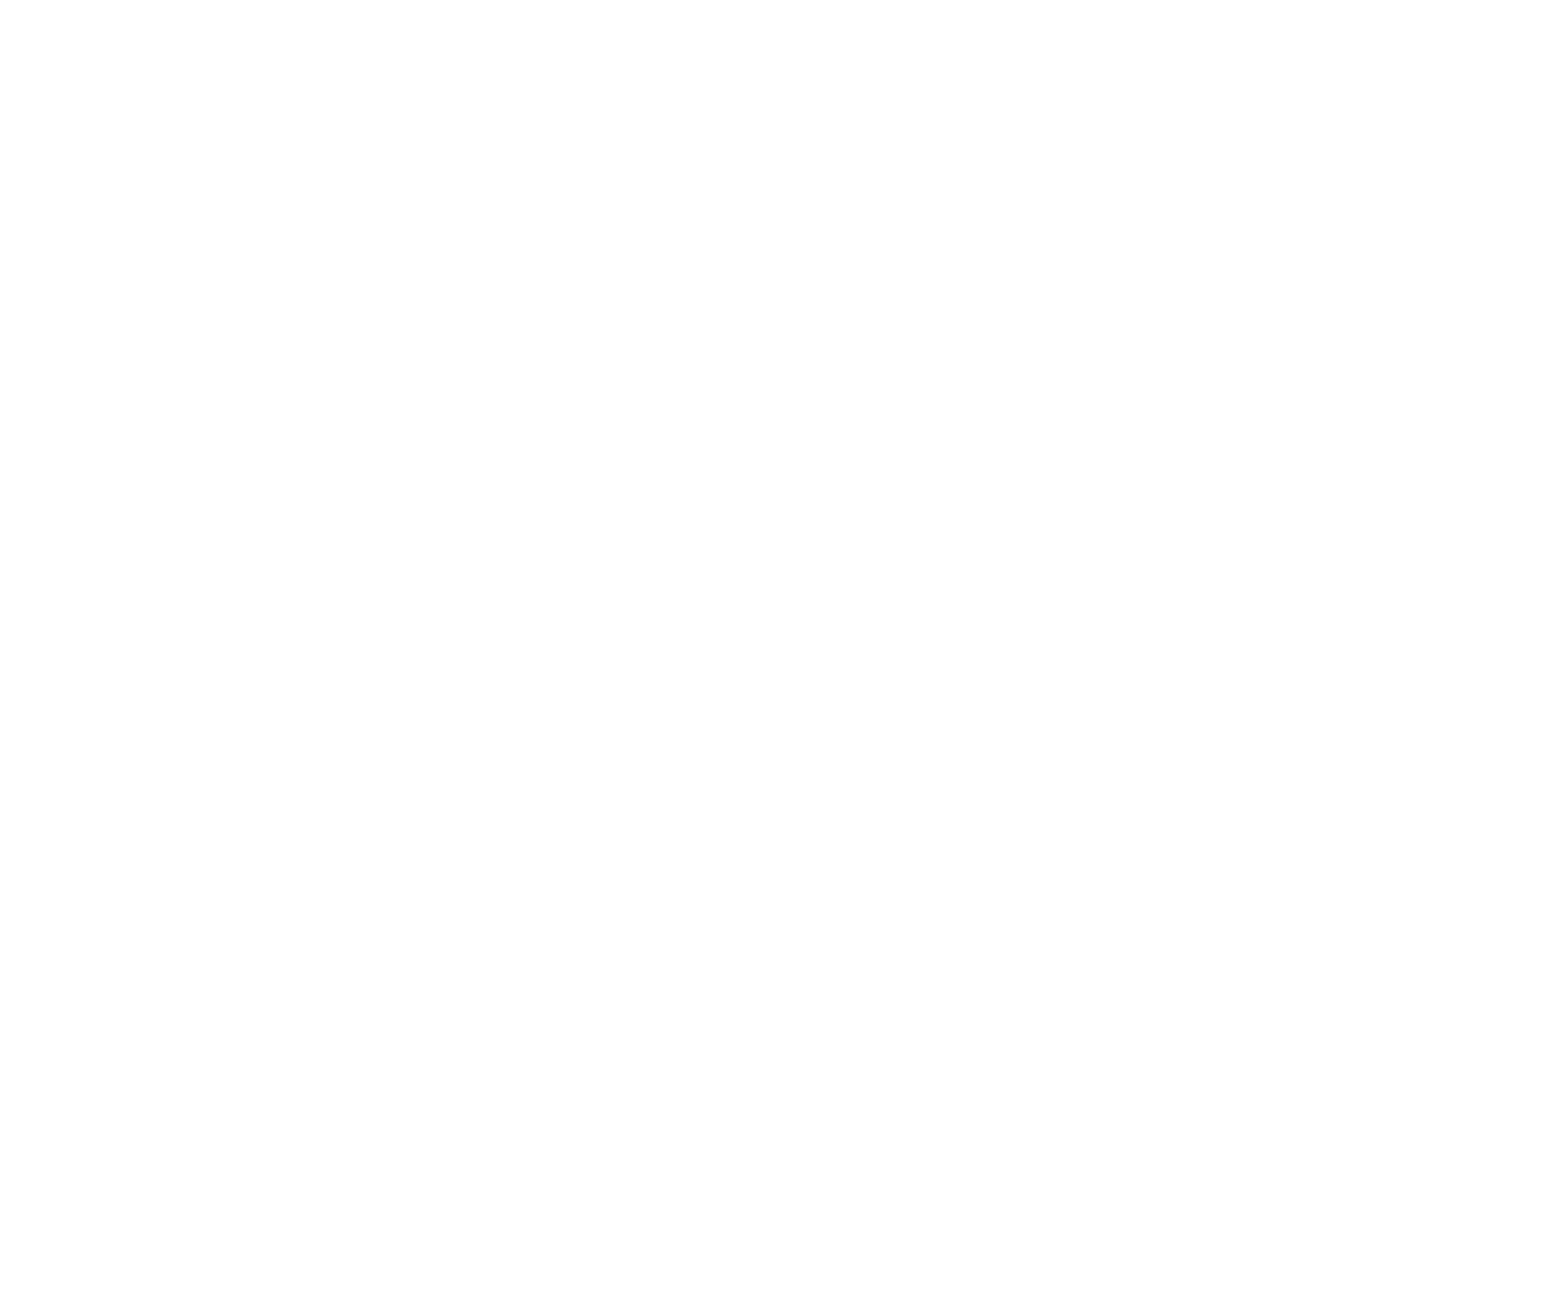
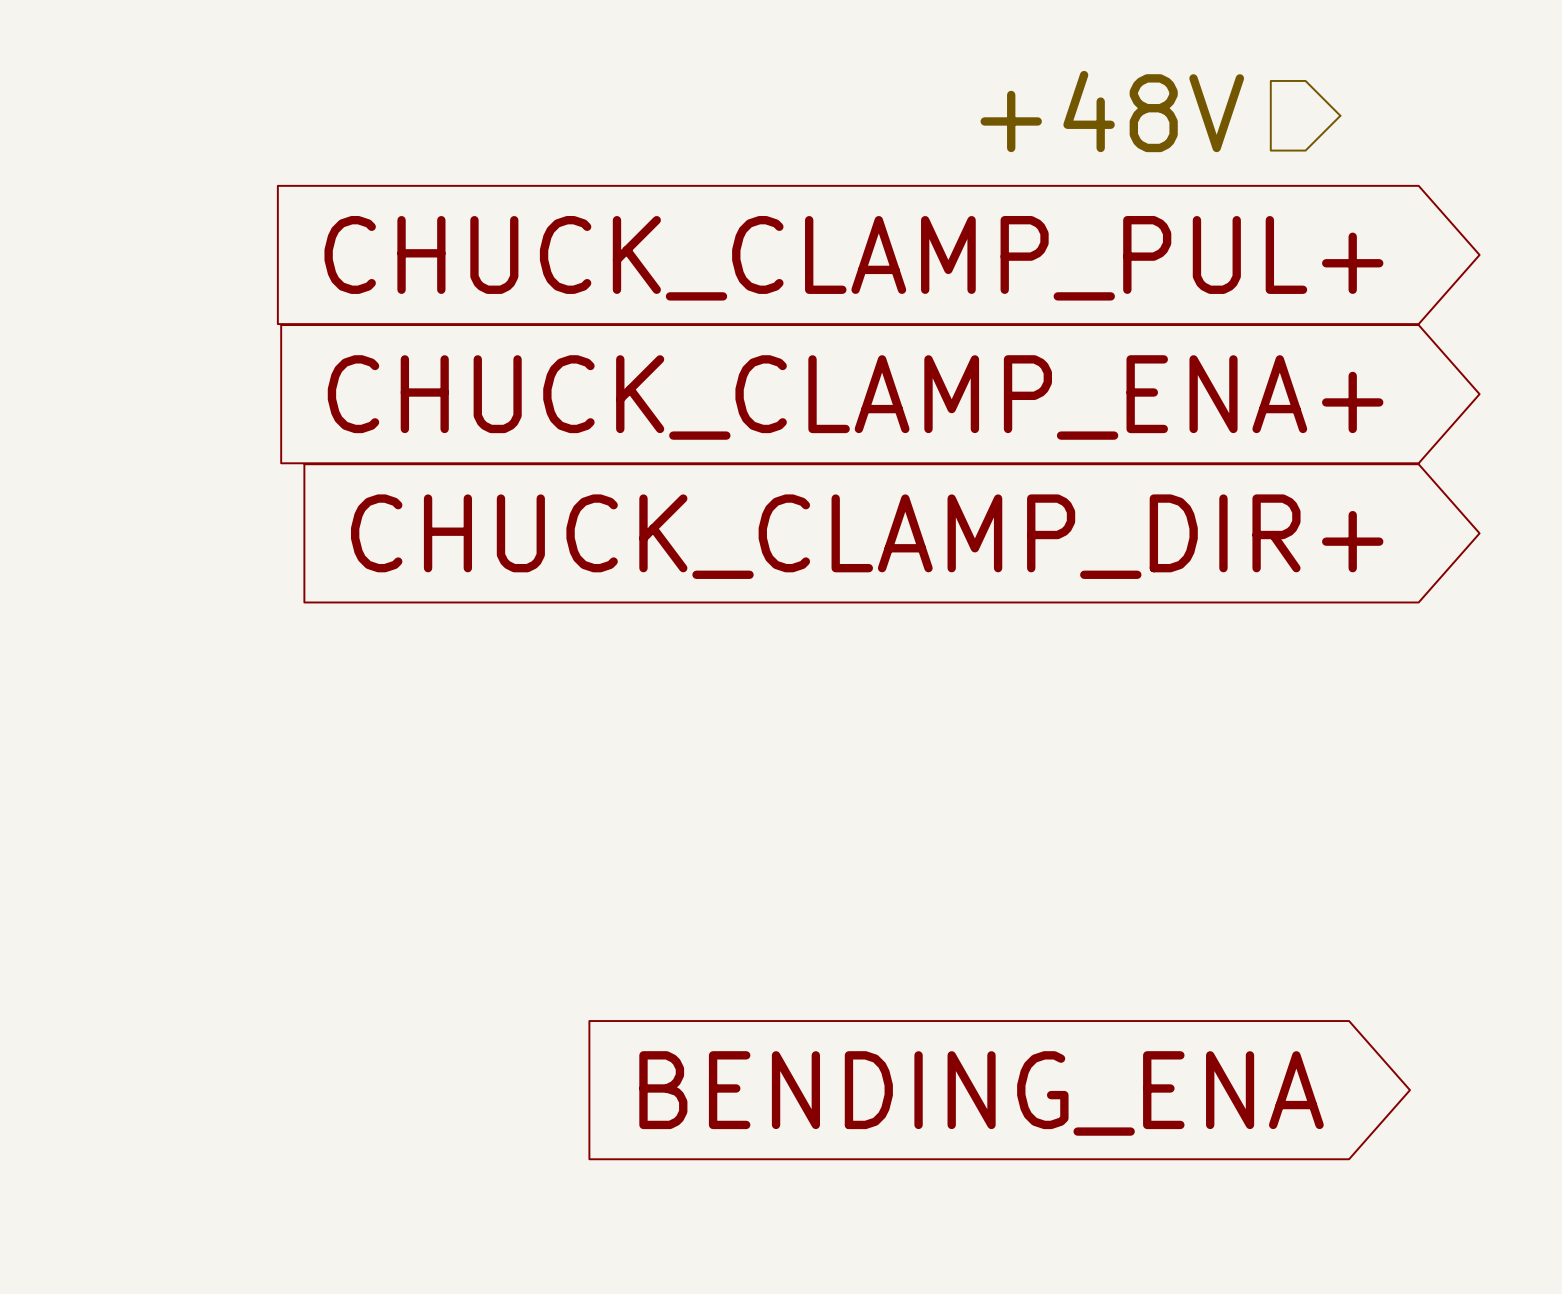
hierarchical label: none -> +48V (1112, 111)
global label: none -> CHUCK_CLAMP_PUL+ (853, 258)
global label: none -> CHUCK_CLAMP_ENA+ (855, 397)
global label: none -> CHUCK_CLAMP_DIR+ (867, 536)
global label: none -> BENDING_ENA (981, 1093)

